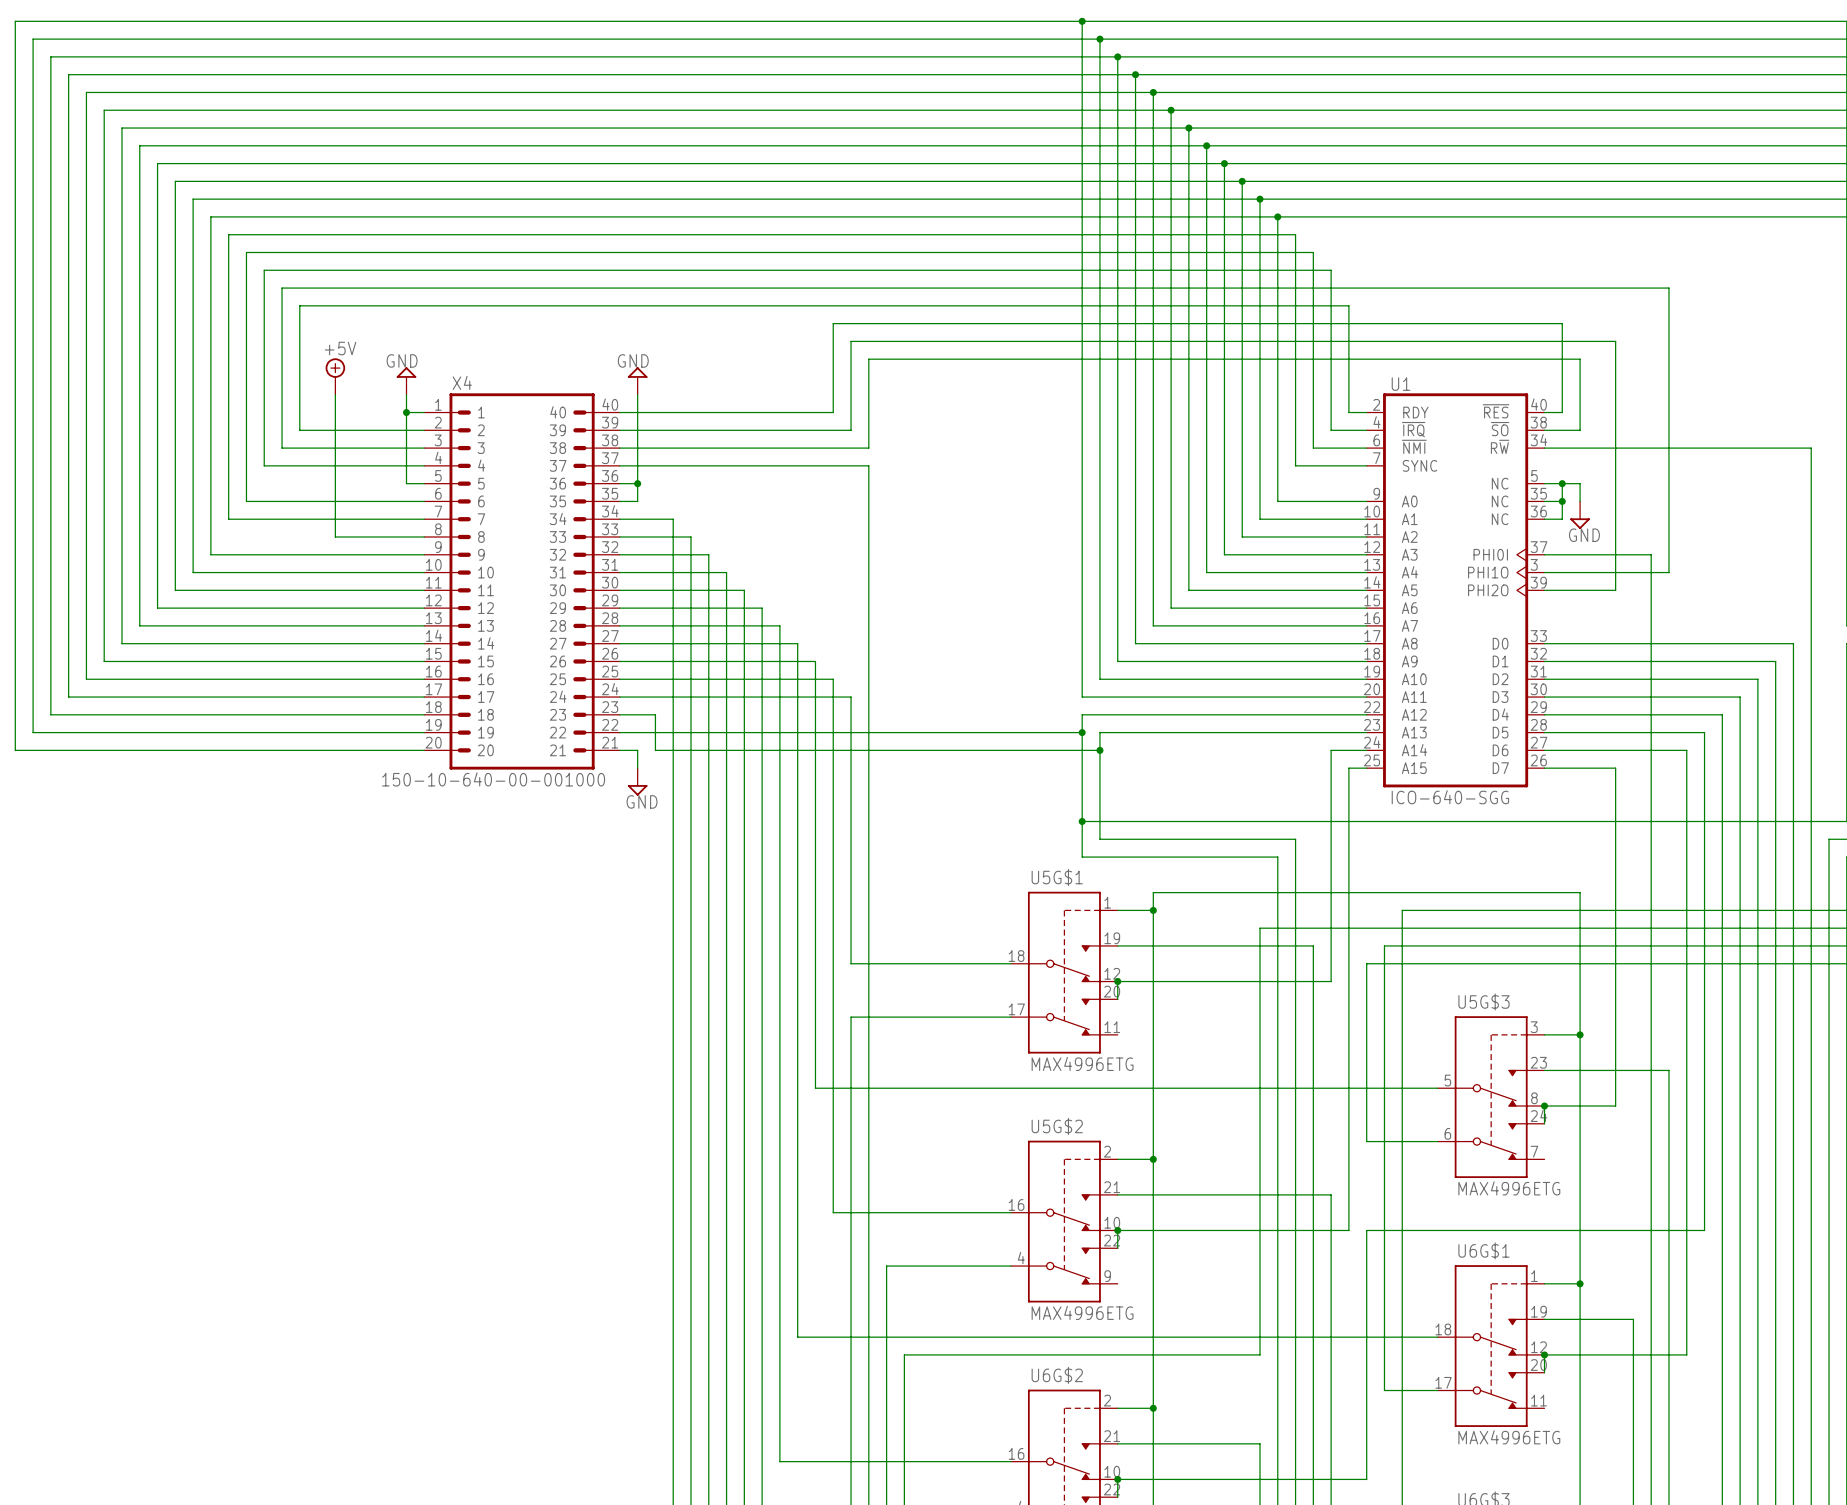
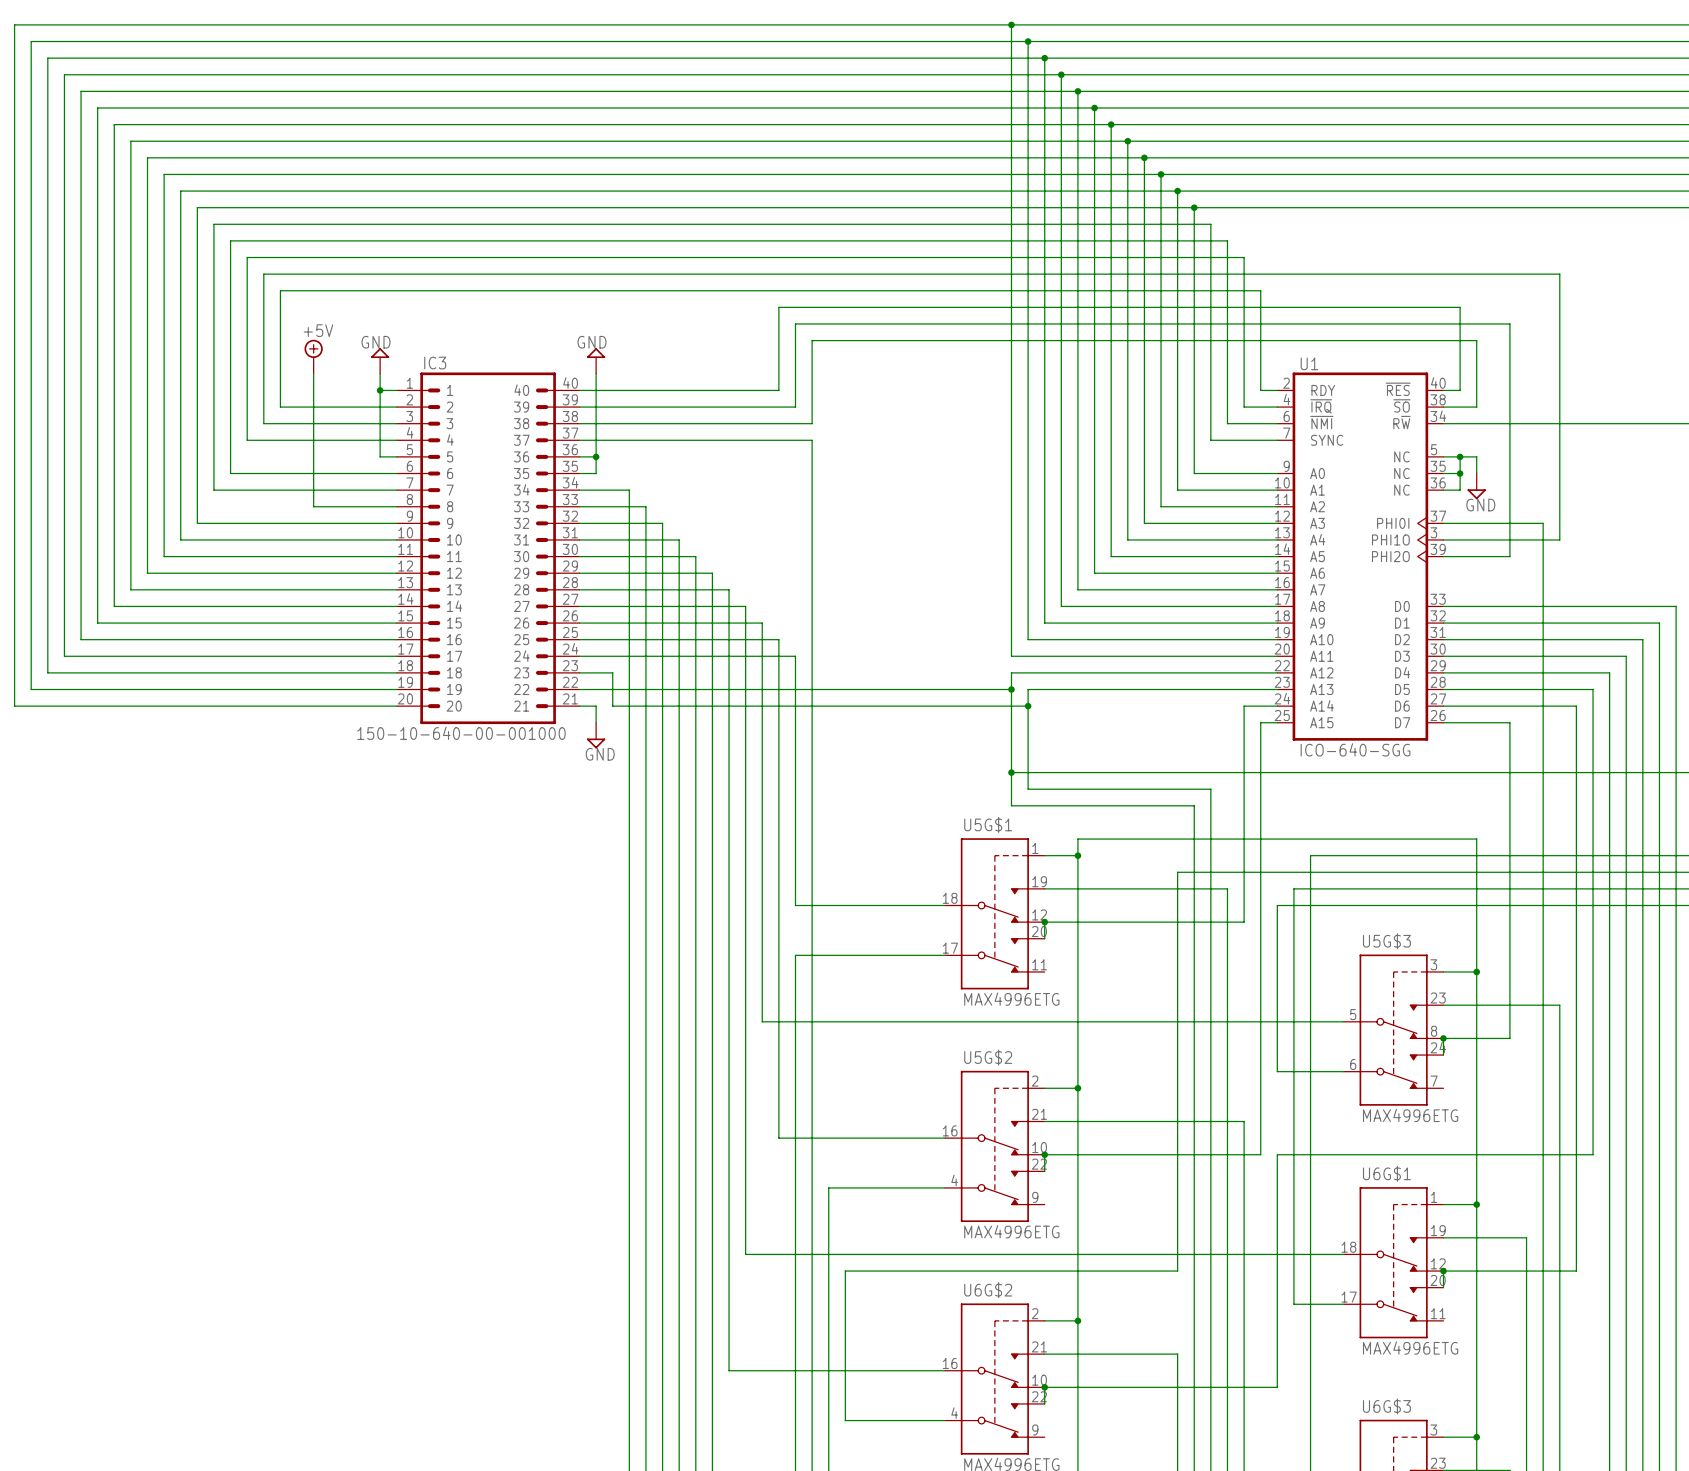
X4 name: X4 (462, 382) -> IC3 (435, 363)

